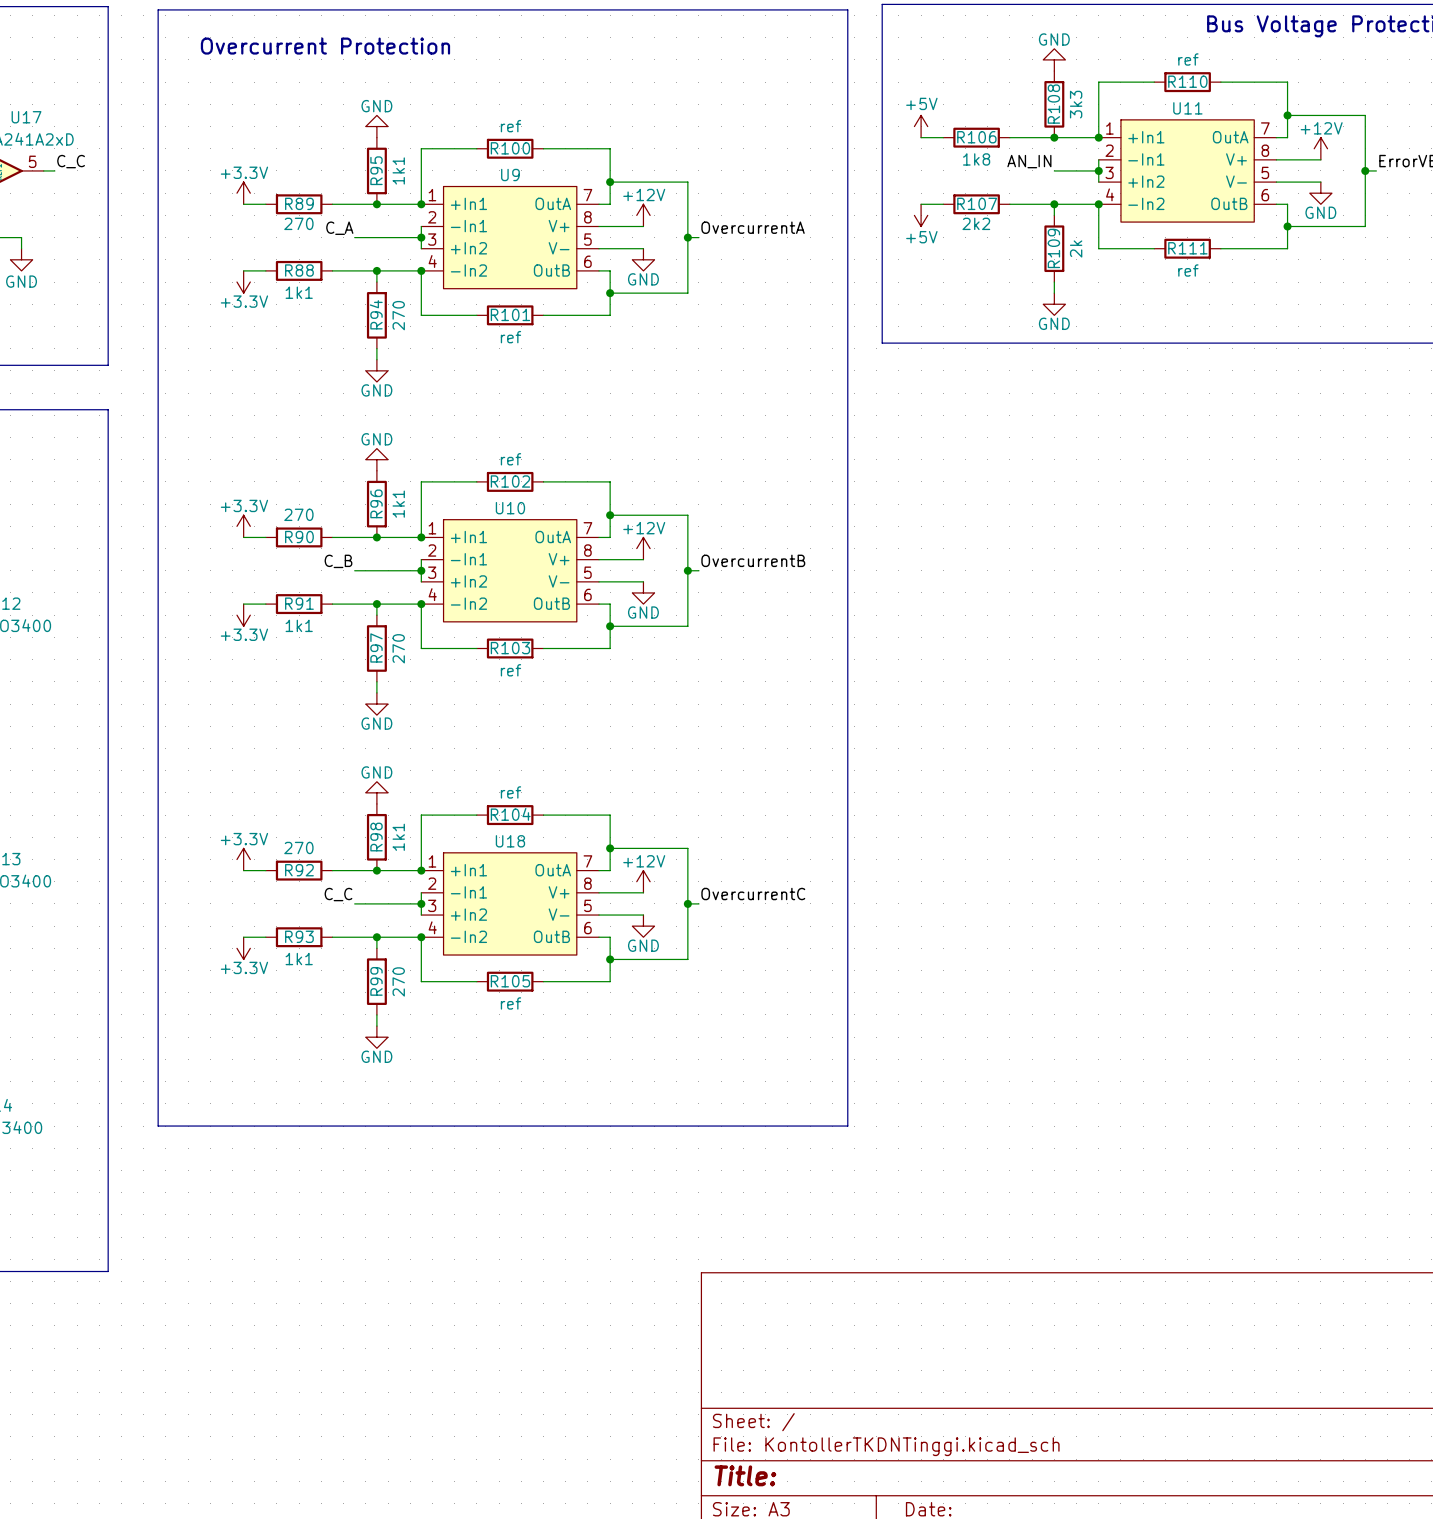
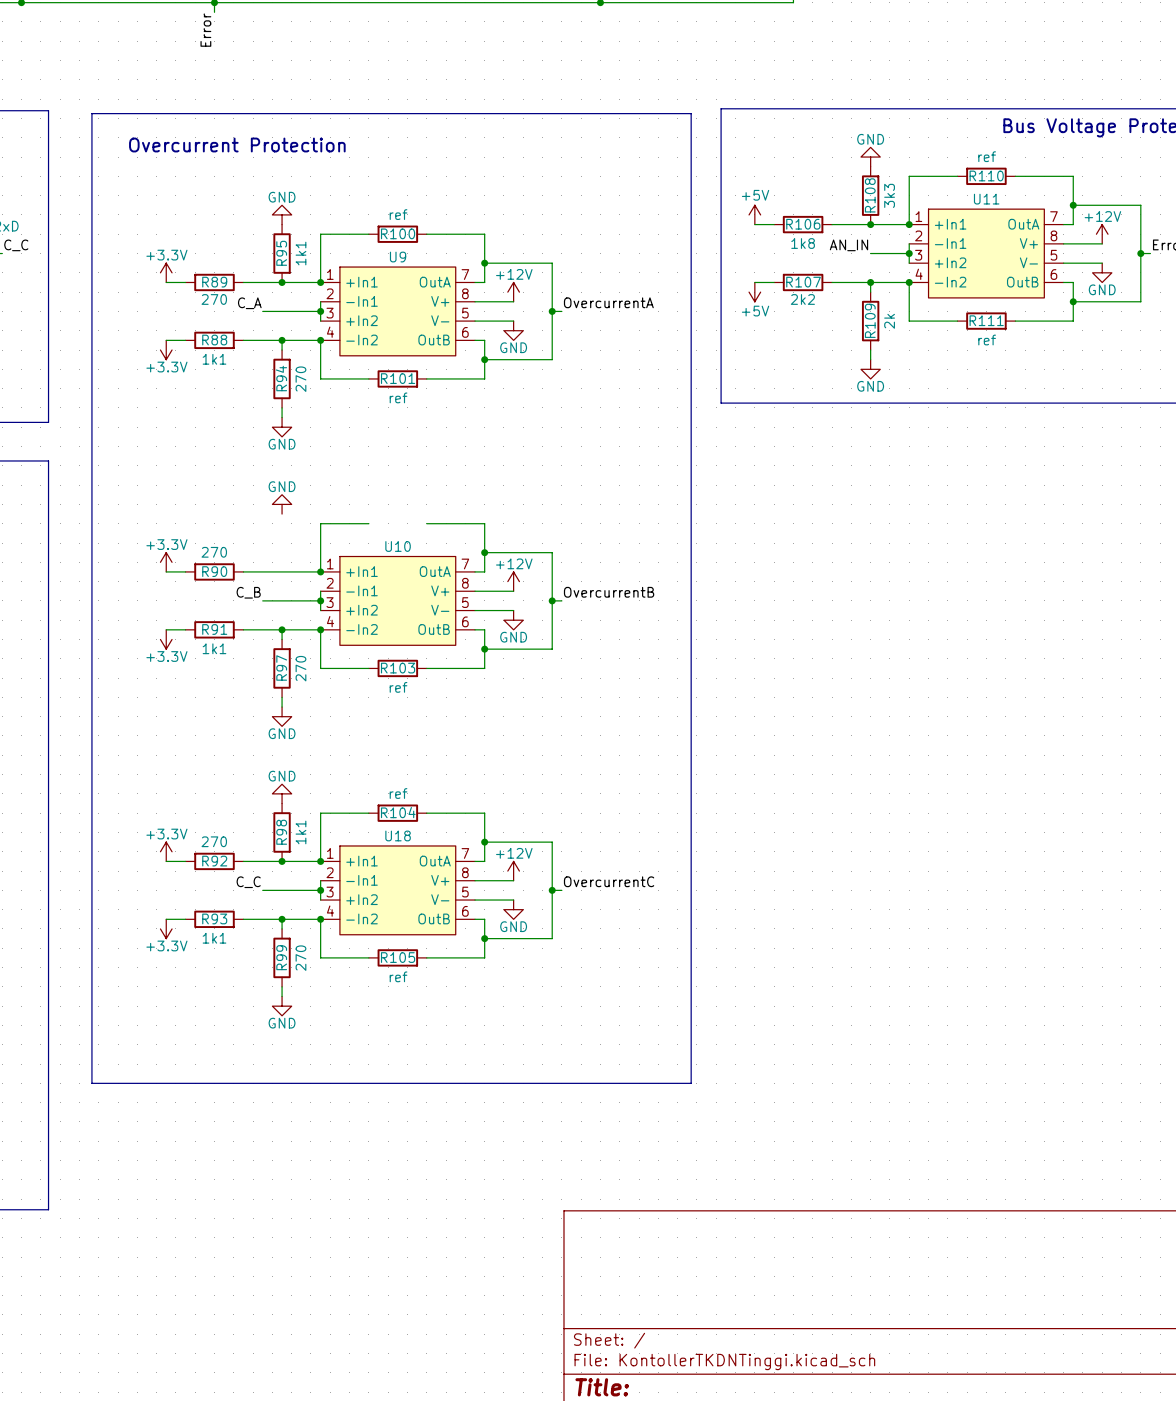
R102: ref (510, 481) -> none
R96: 1k1 (376, 504) -> none
junction: (376, 537) -> none

